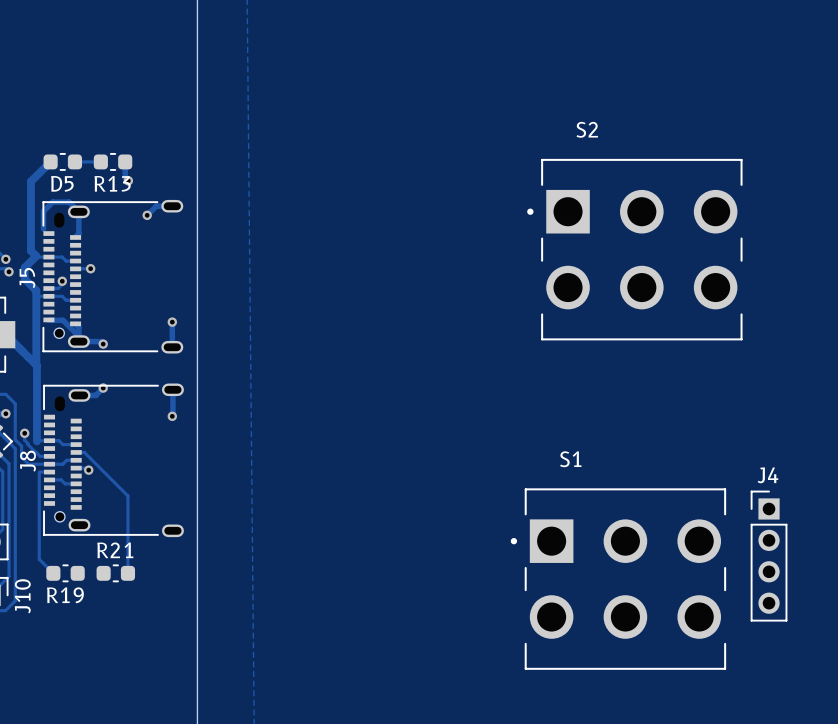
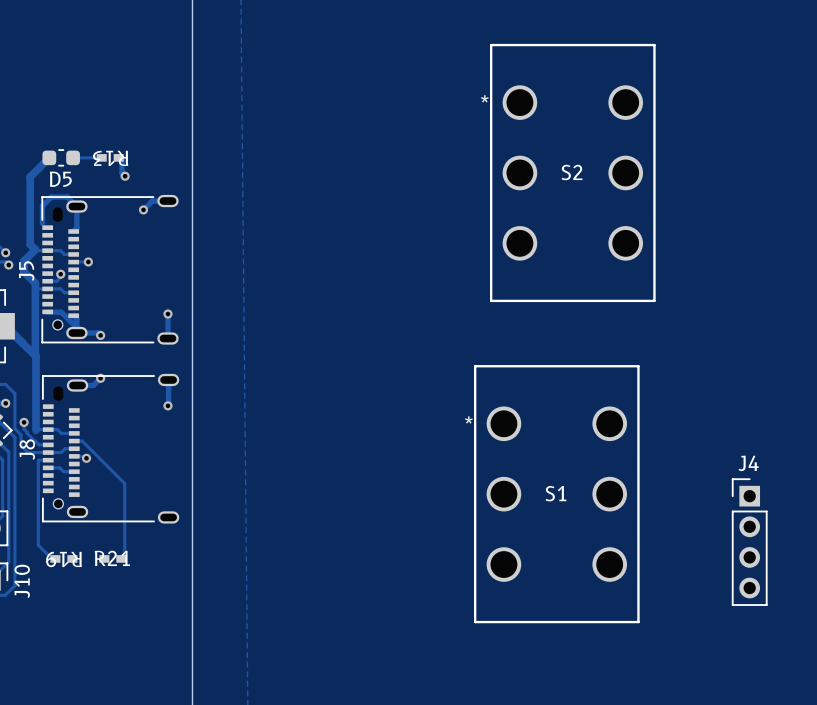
S2 name position: S2 (587, 129) -> S2 (571, 172)
R13 footprint: [93, 152, 133, 171] -> [96, 154, 124, 162]
S2 footprint: [527, 158, 743, 341] -> [489, 43, 656, 303]
S1 name position: S1 (570, 459) -> S1 (555, 493)
S1 footprint: [510, 488, 727, 670] -> [473, 365, 640, 624]
R19 footprint: [46, 564, 85, 583] -> [50, 555, 78, 563]
R21 footprint: [96, 564, 136, 583] -> [99, 555, 127, 563]

